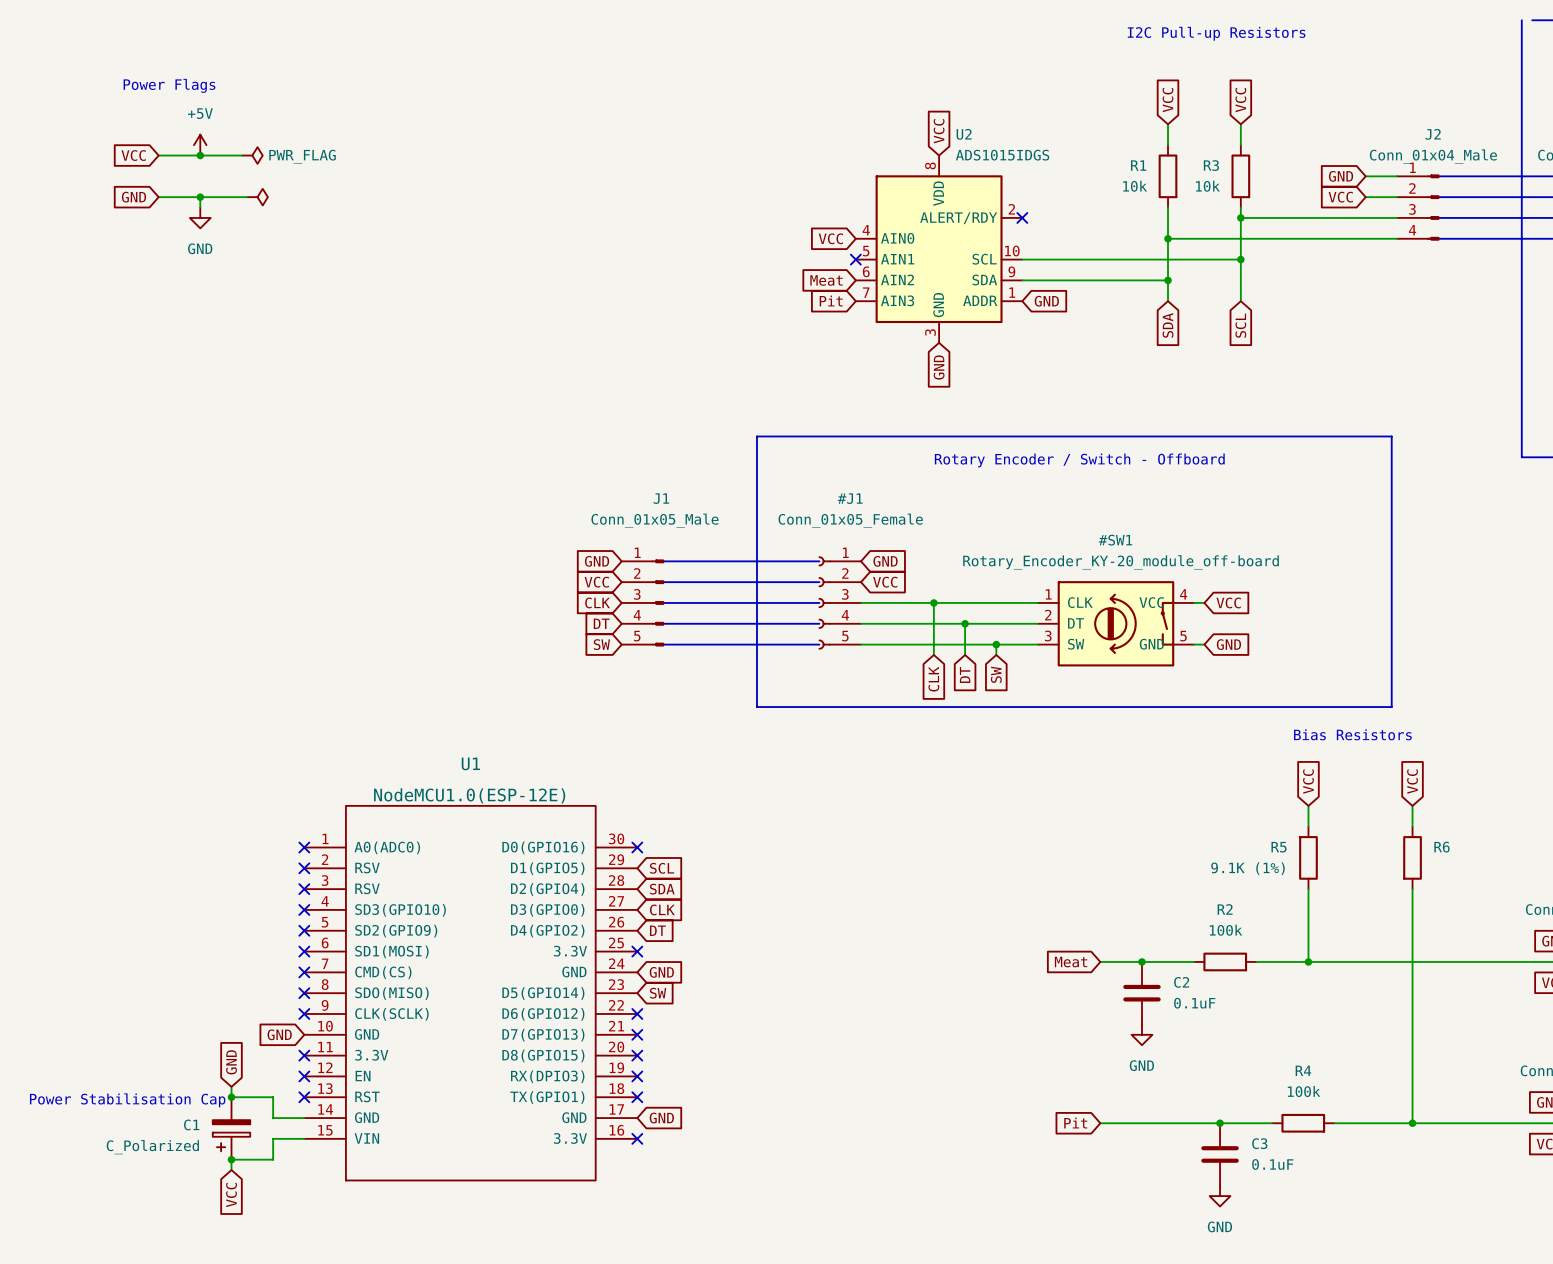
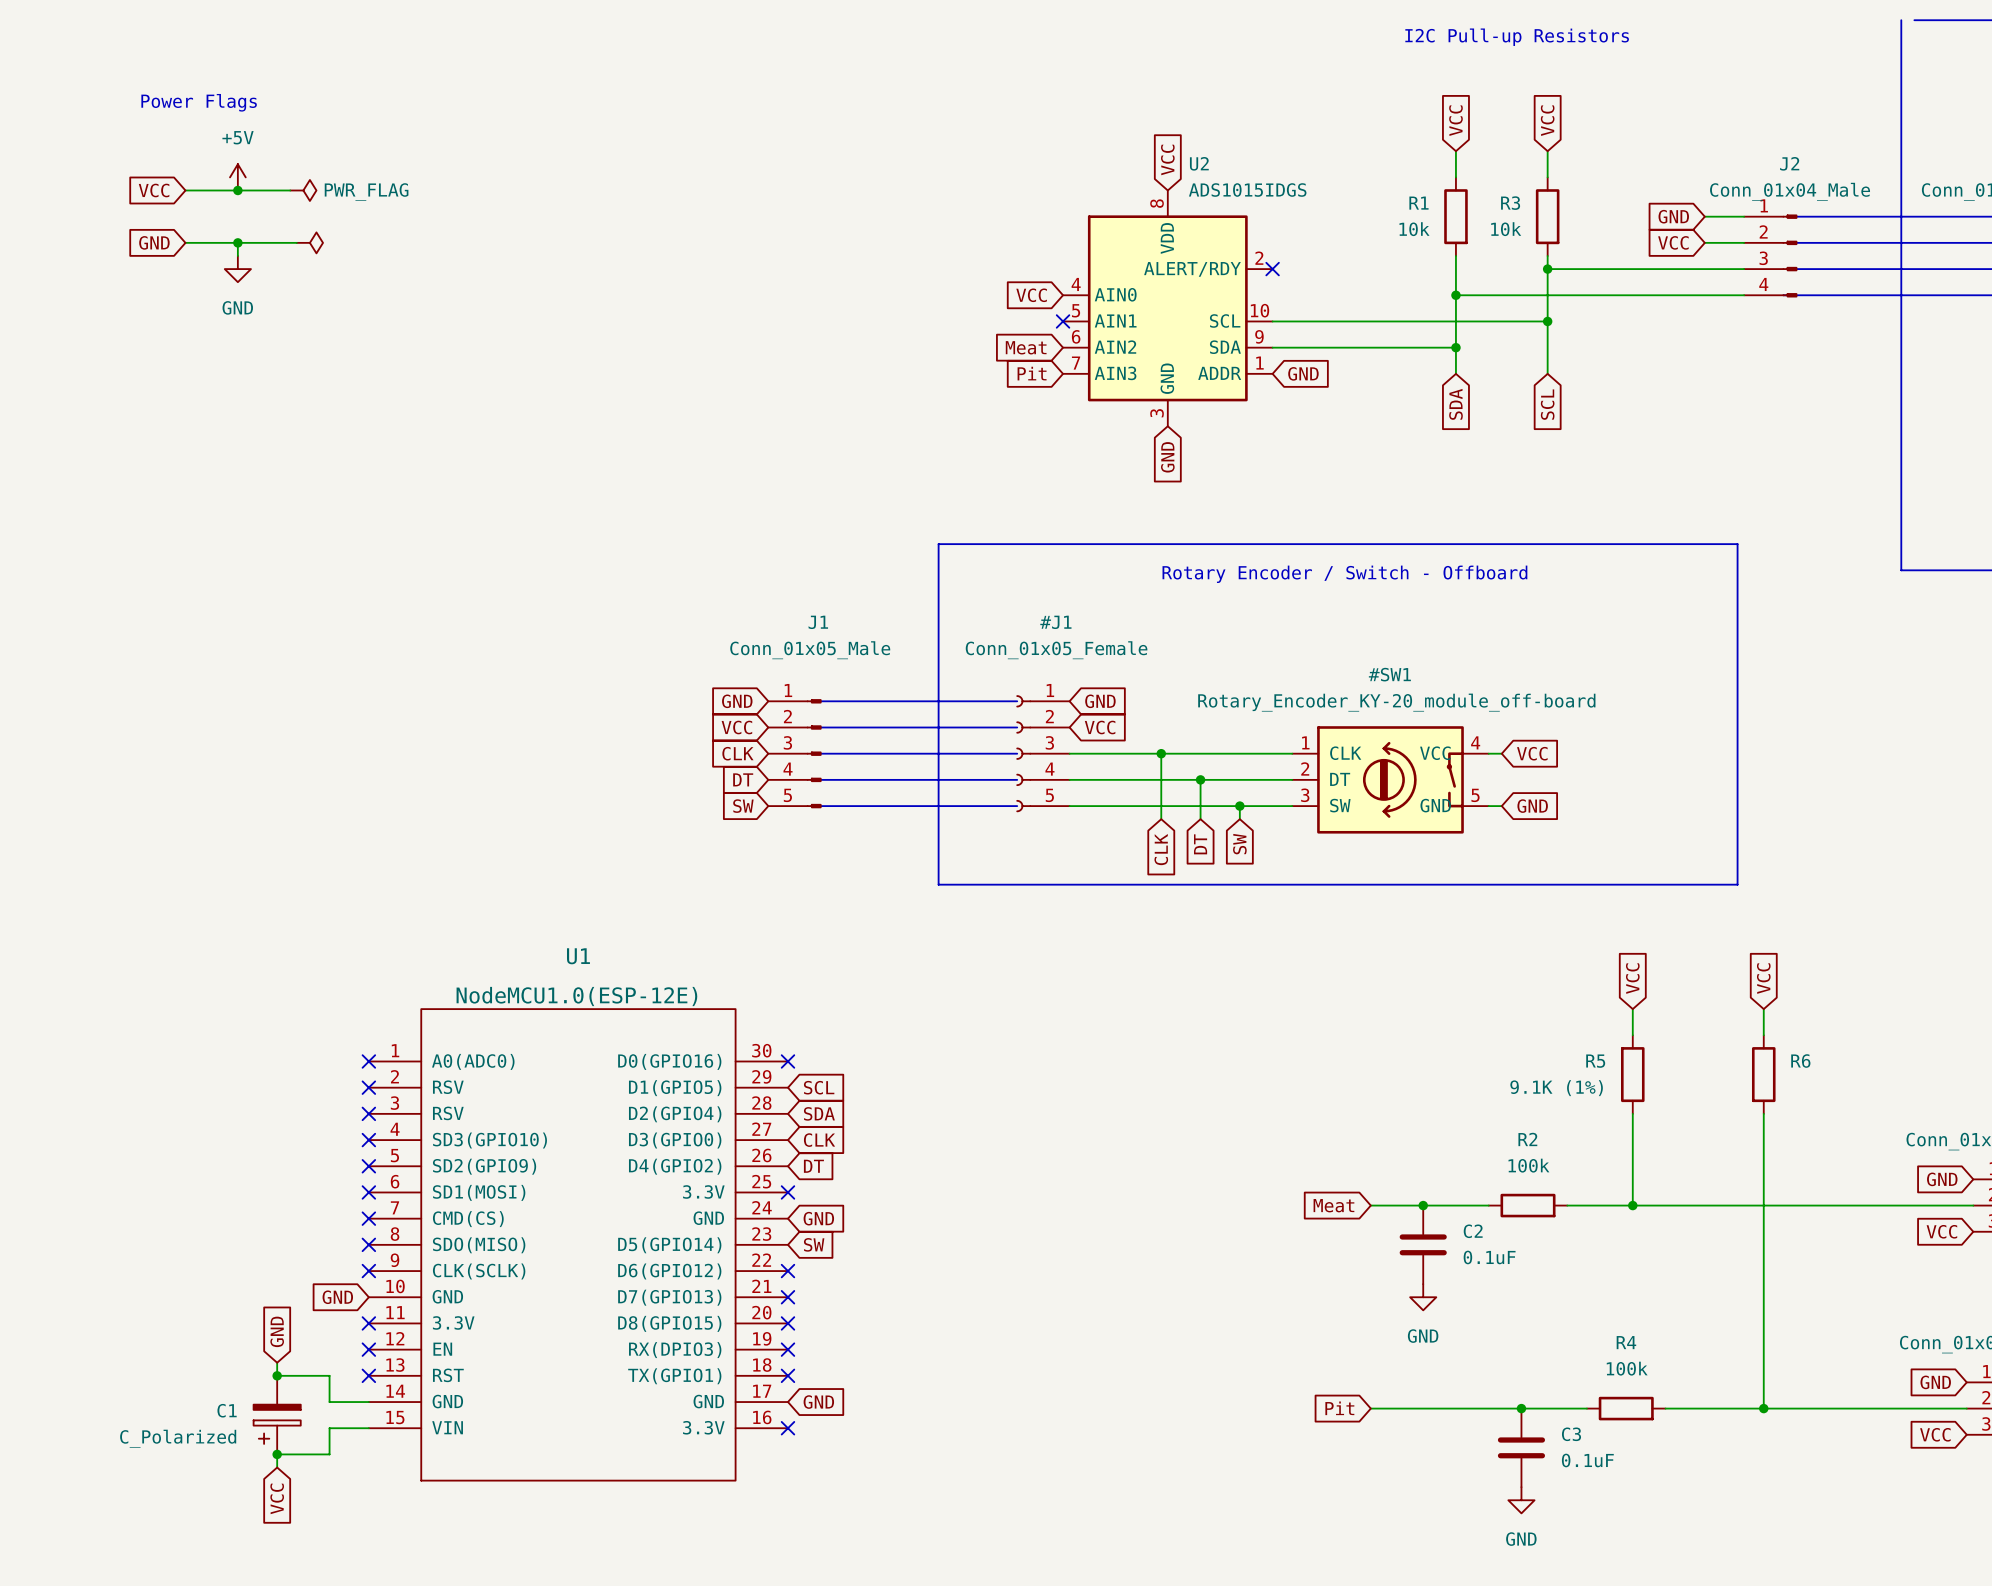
text: Bias Resistors (1352, 734) -> none
text: Power Stabilisation Cap (127, 1100) -> none

